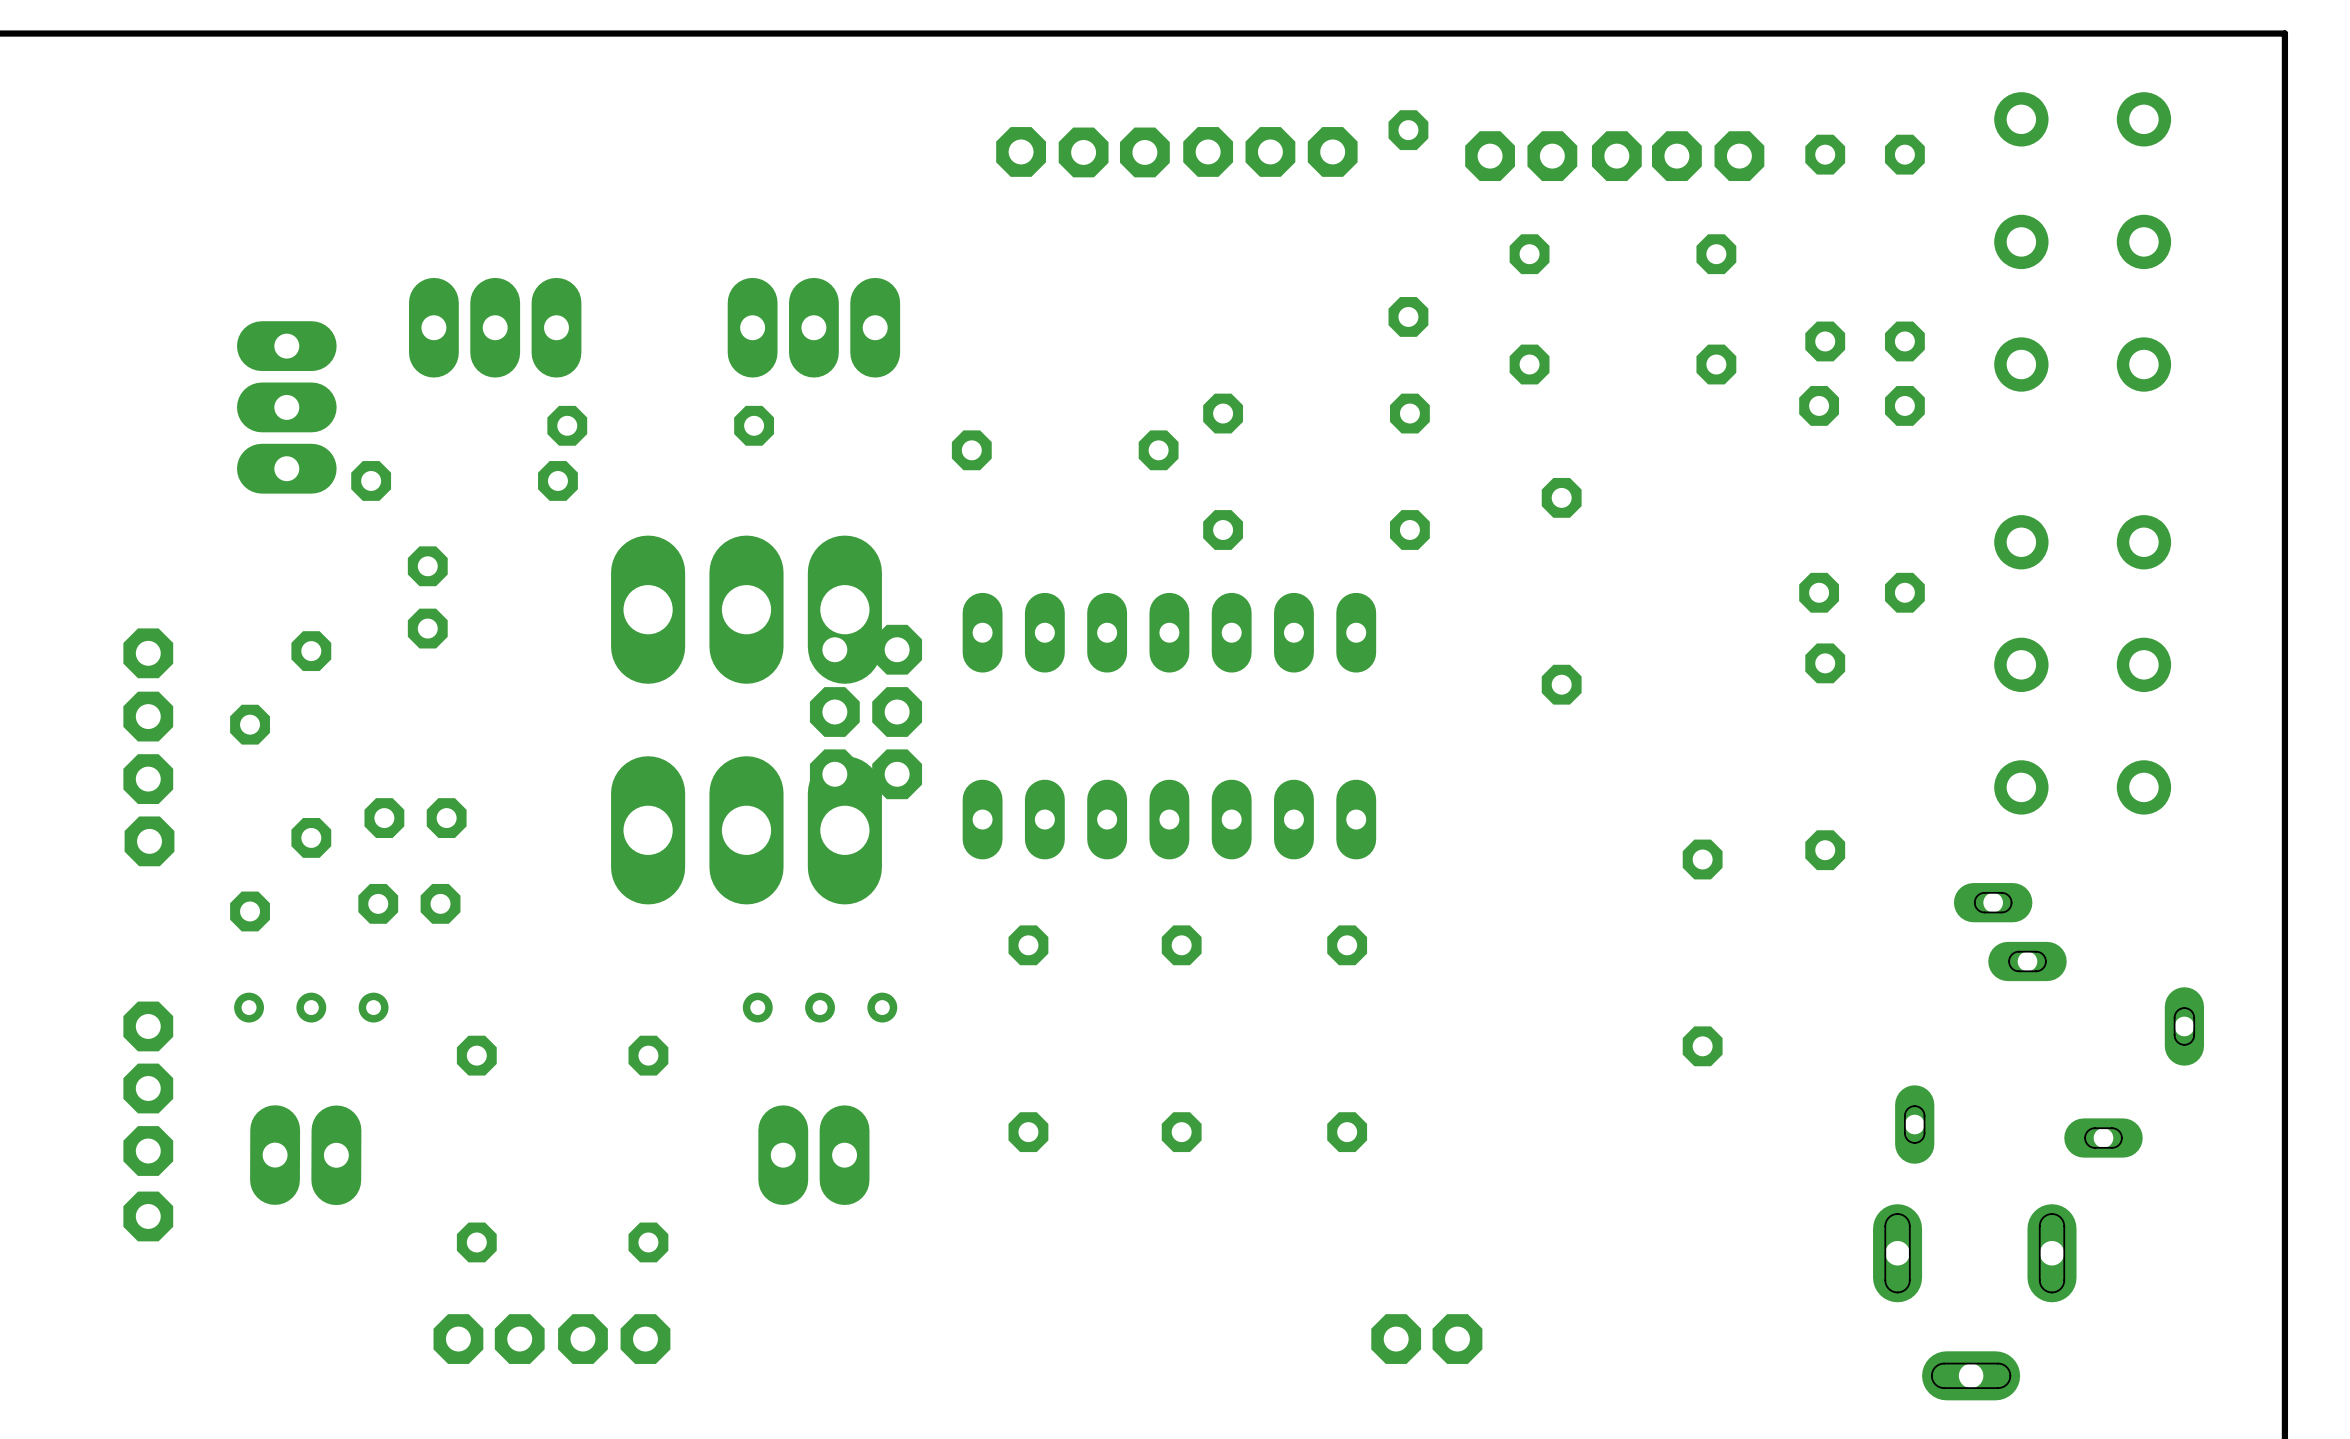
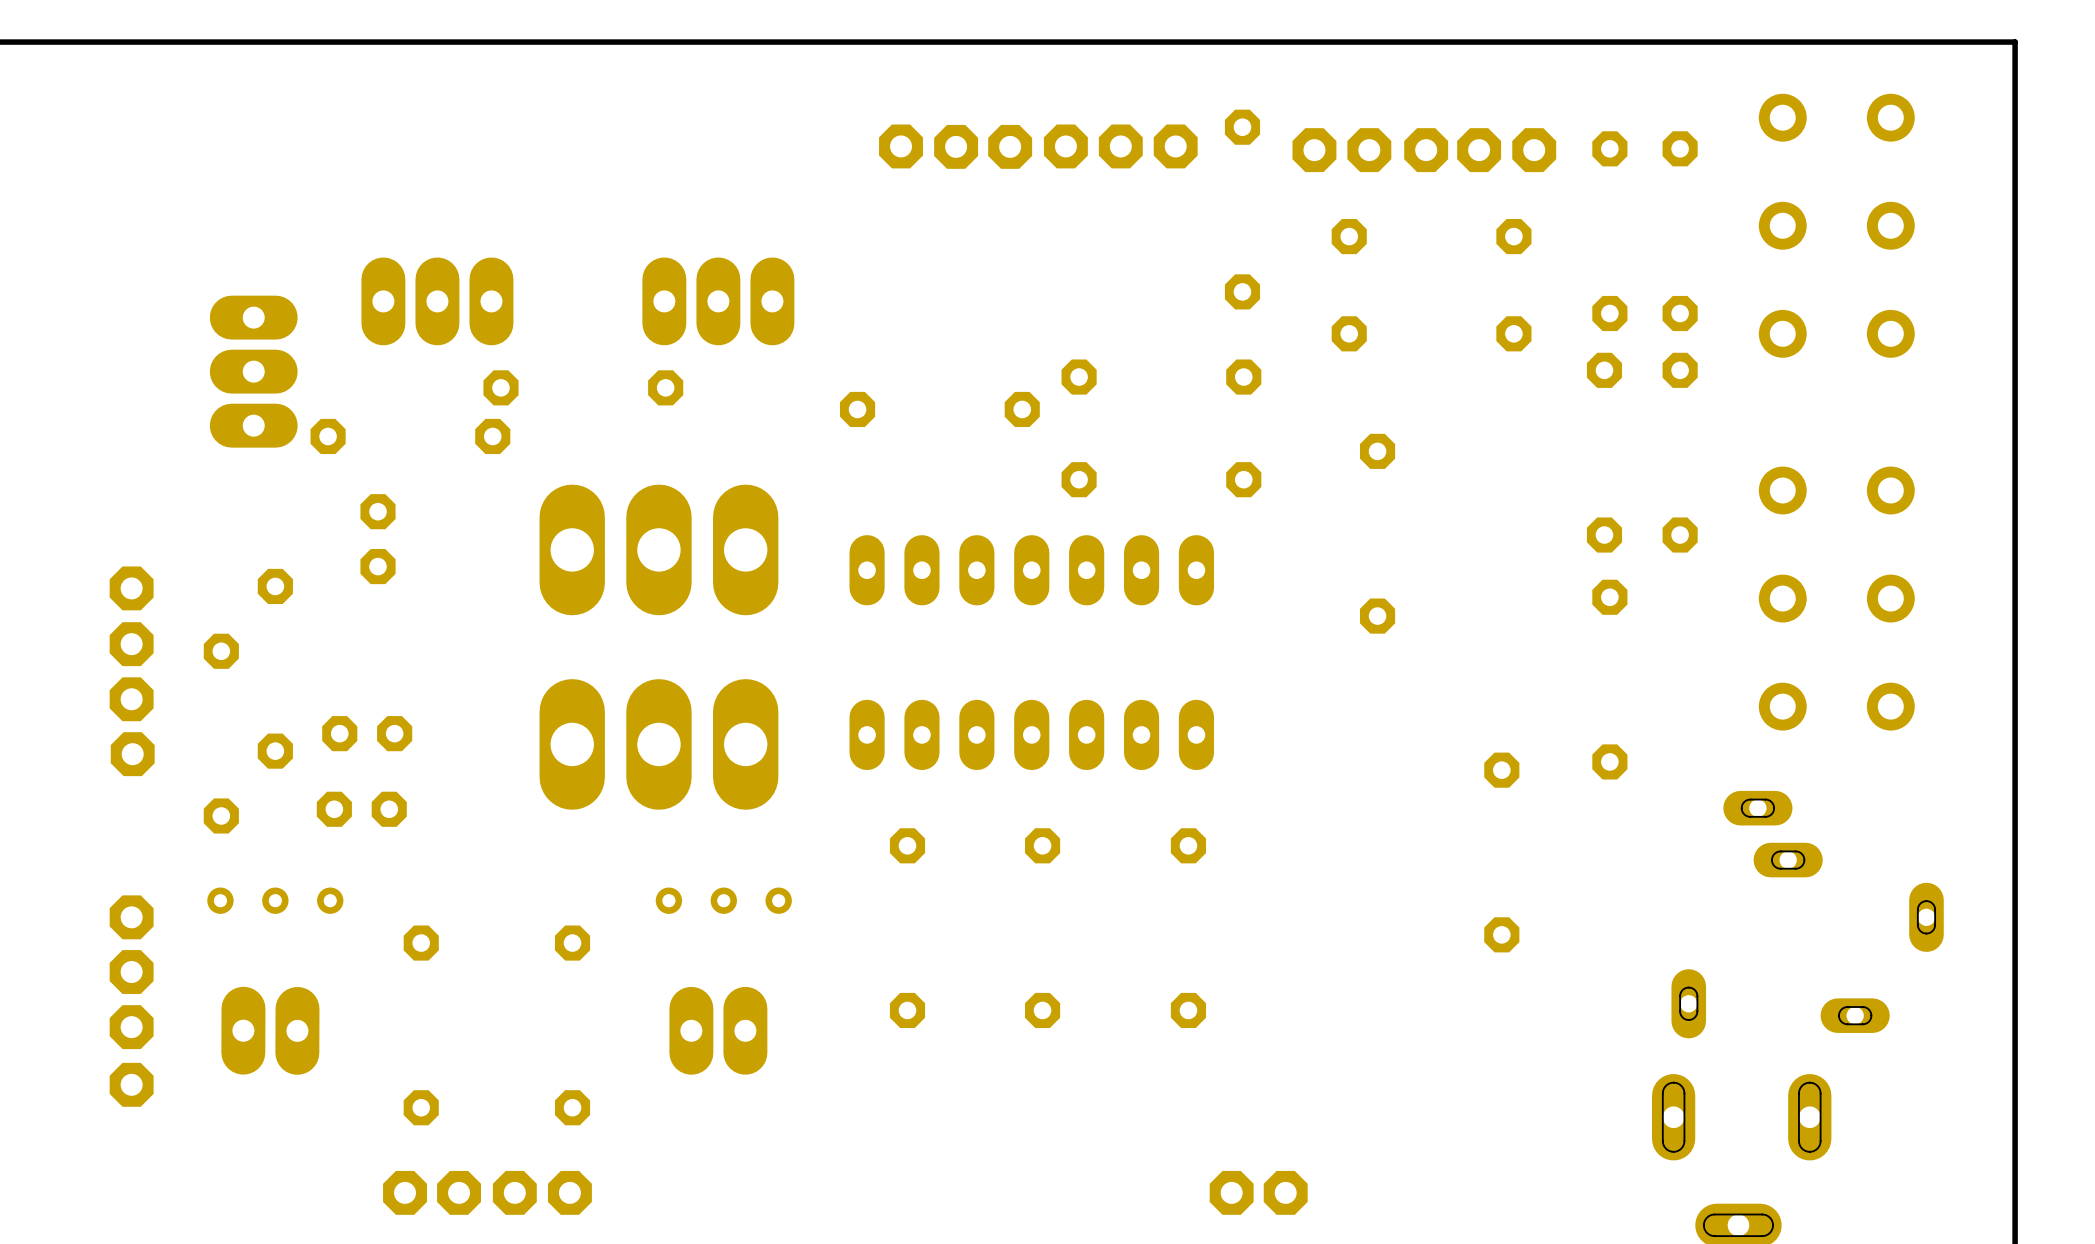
part: (865, 712) -> none

